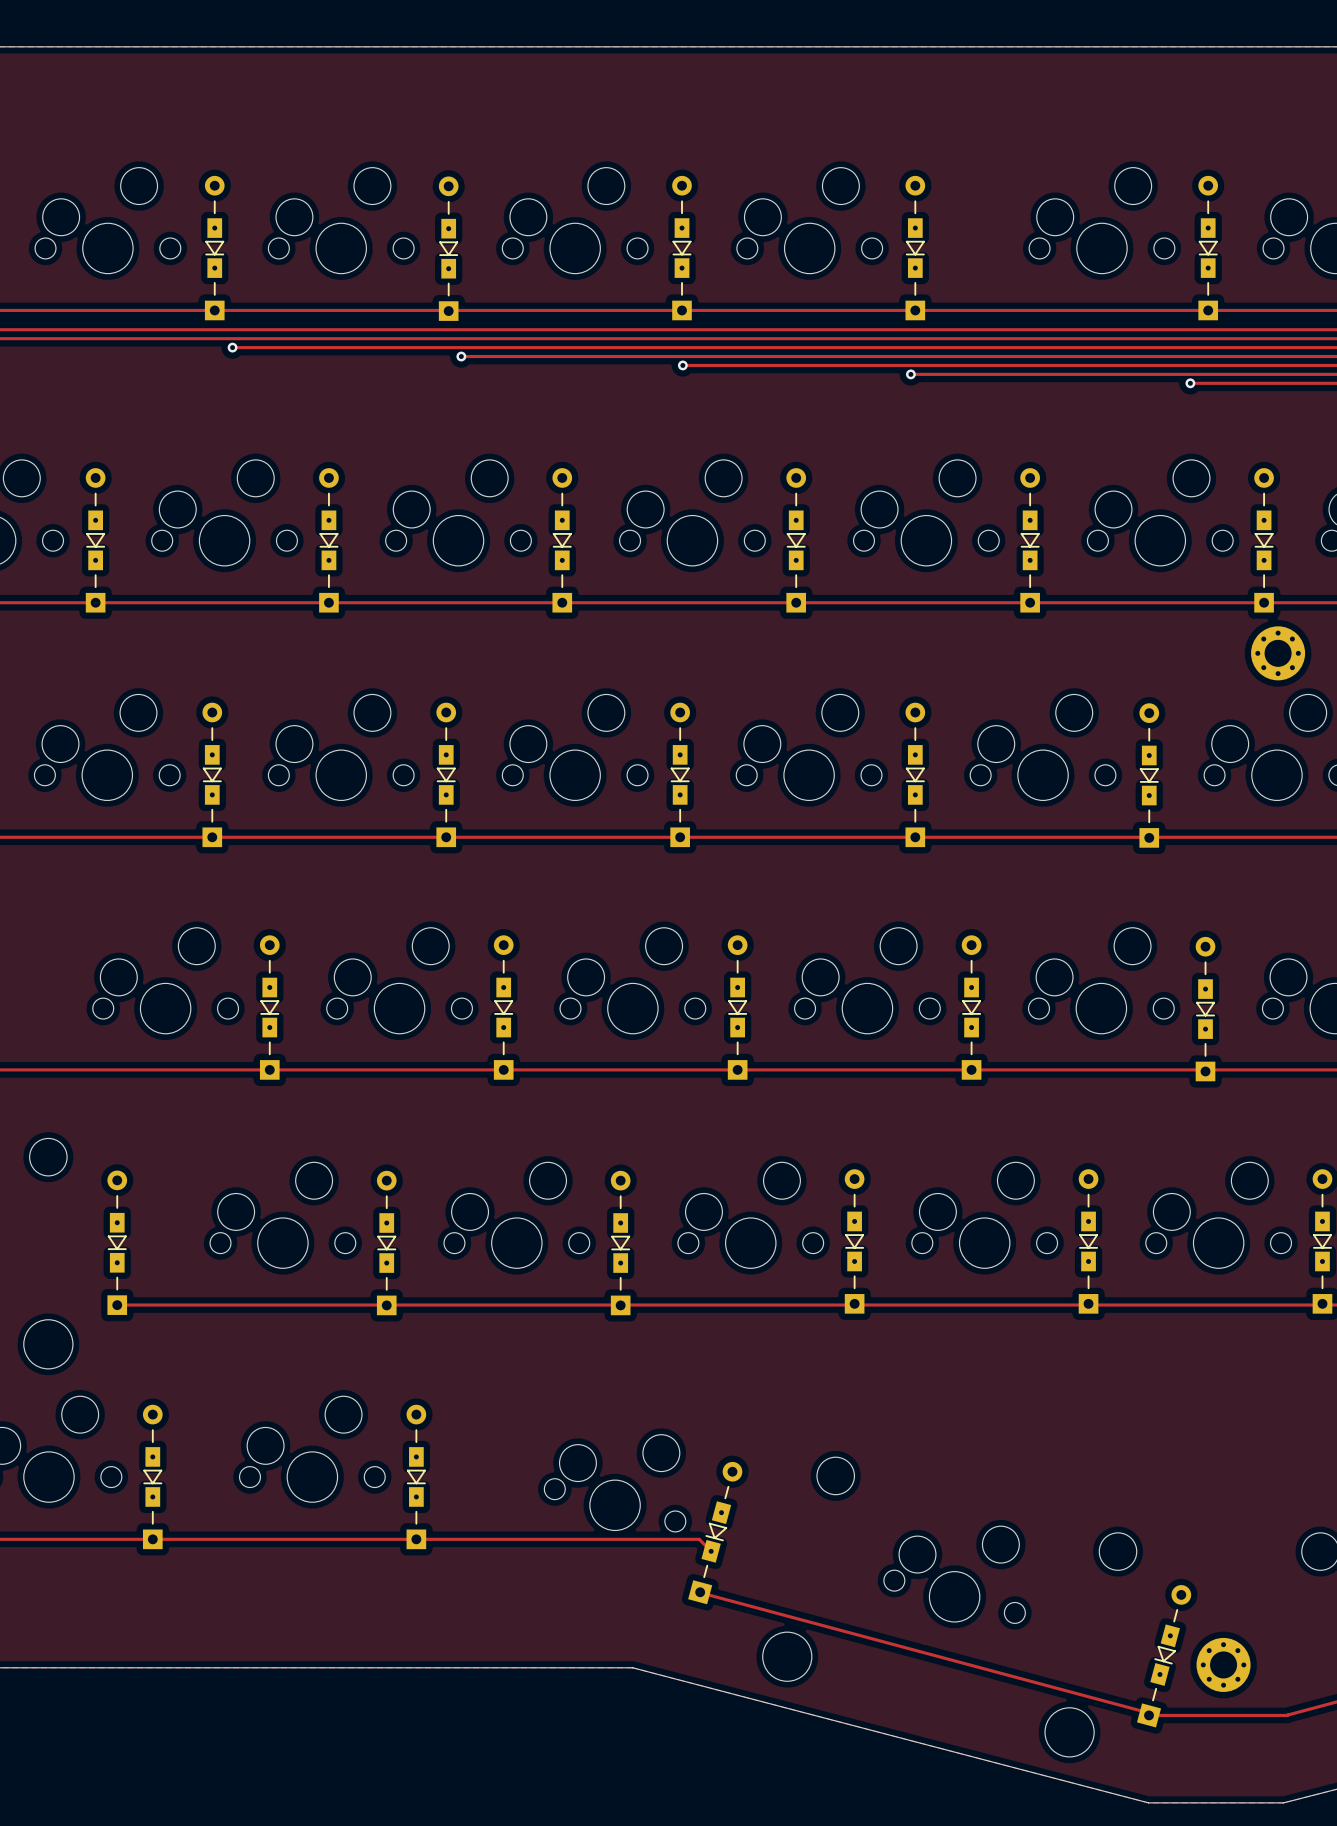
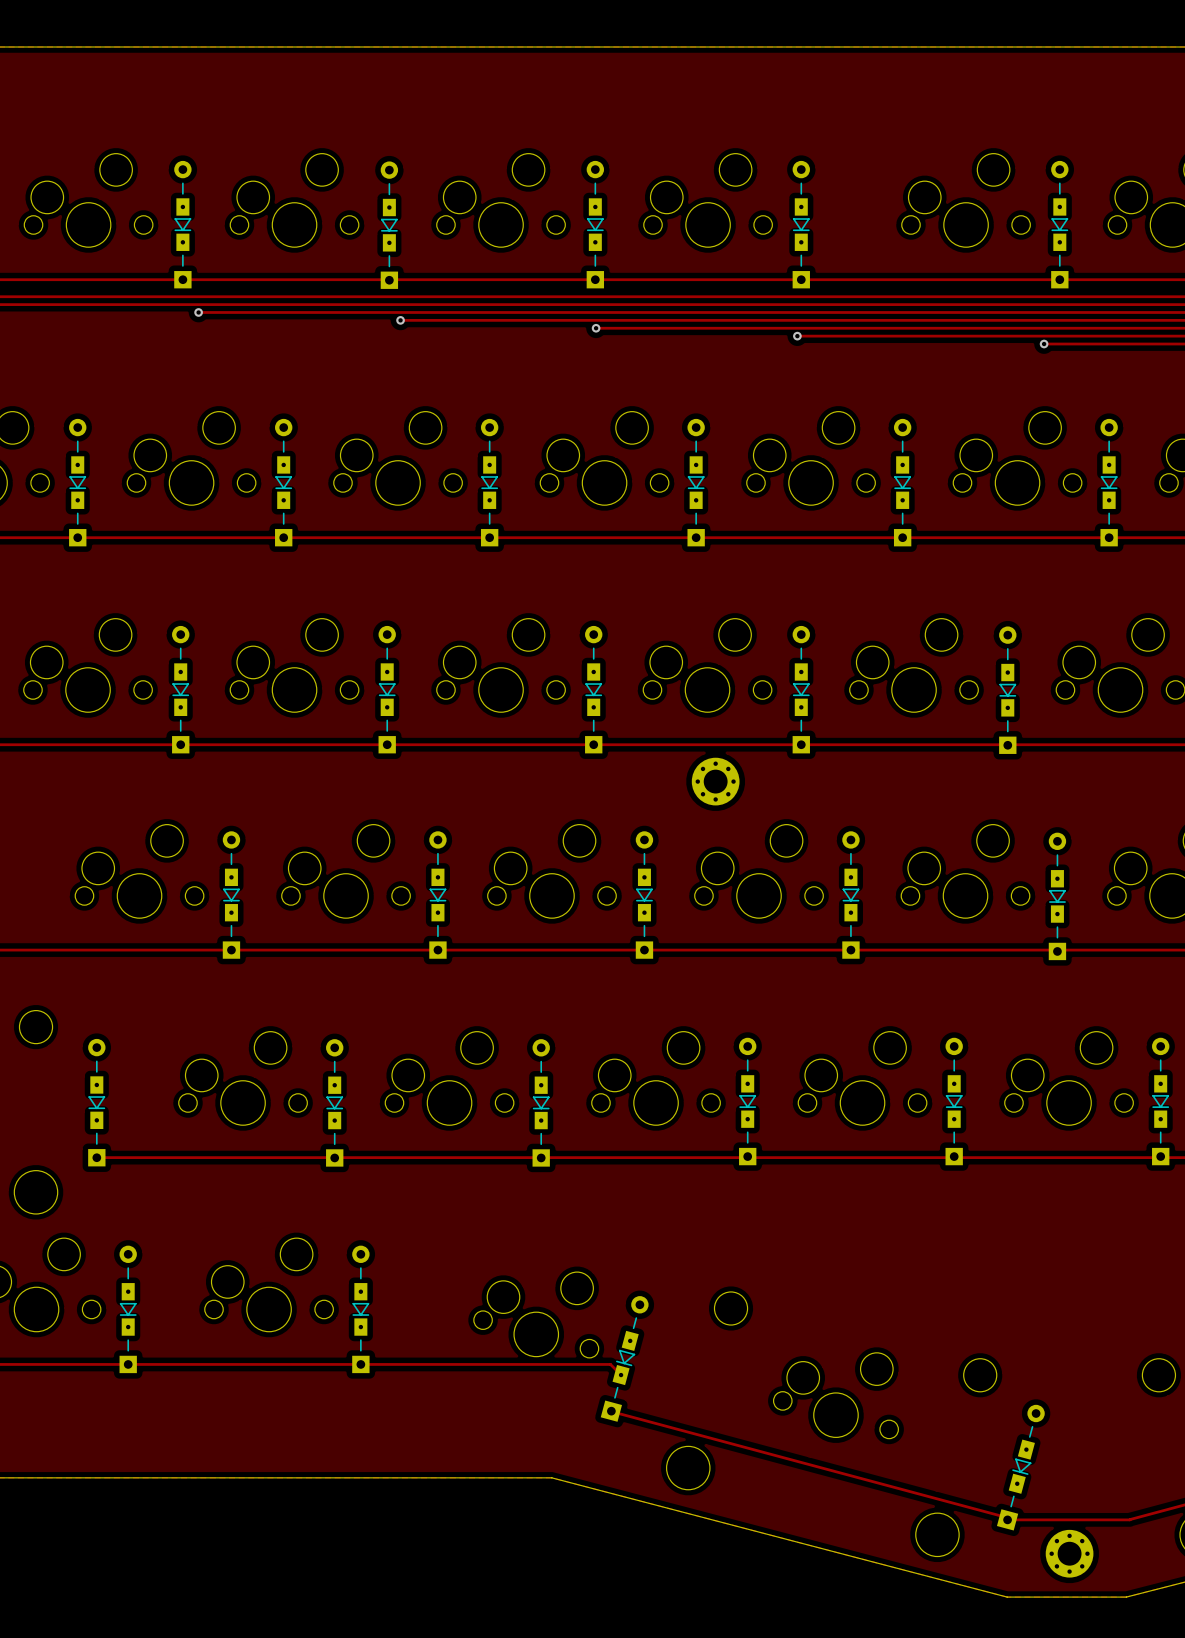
part: (1278, 653) -> none
part: none -> (715, 781)
part position: (1223, 1664) -> (1069, 1553)

